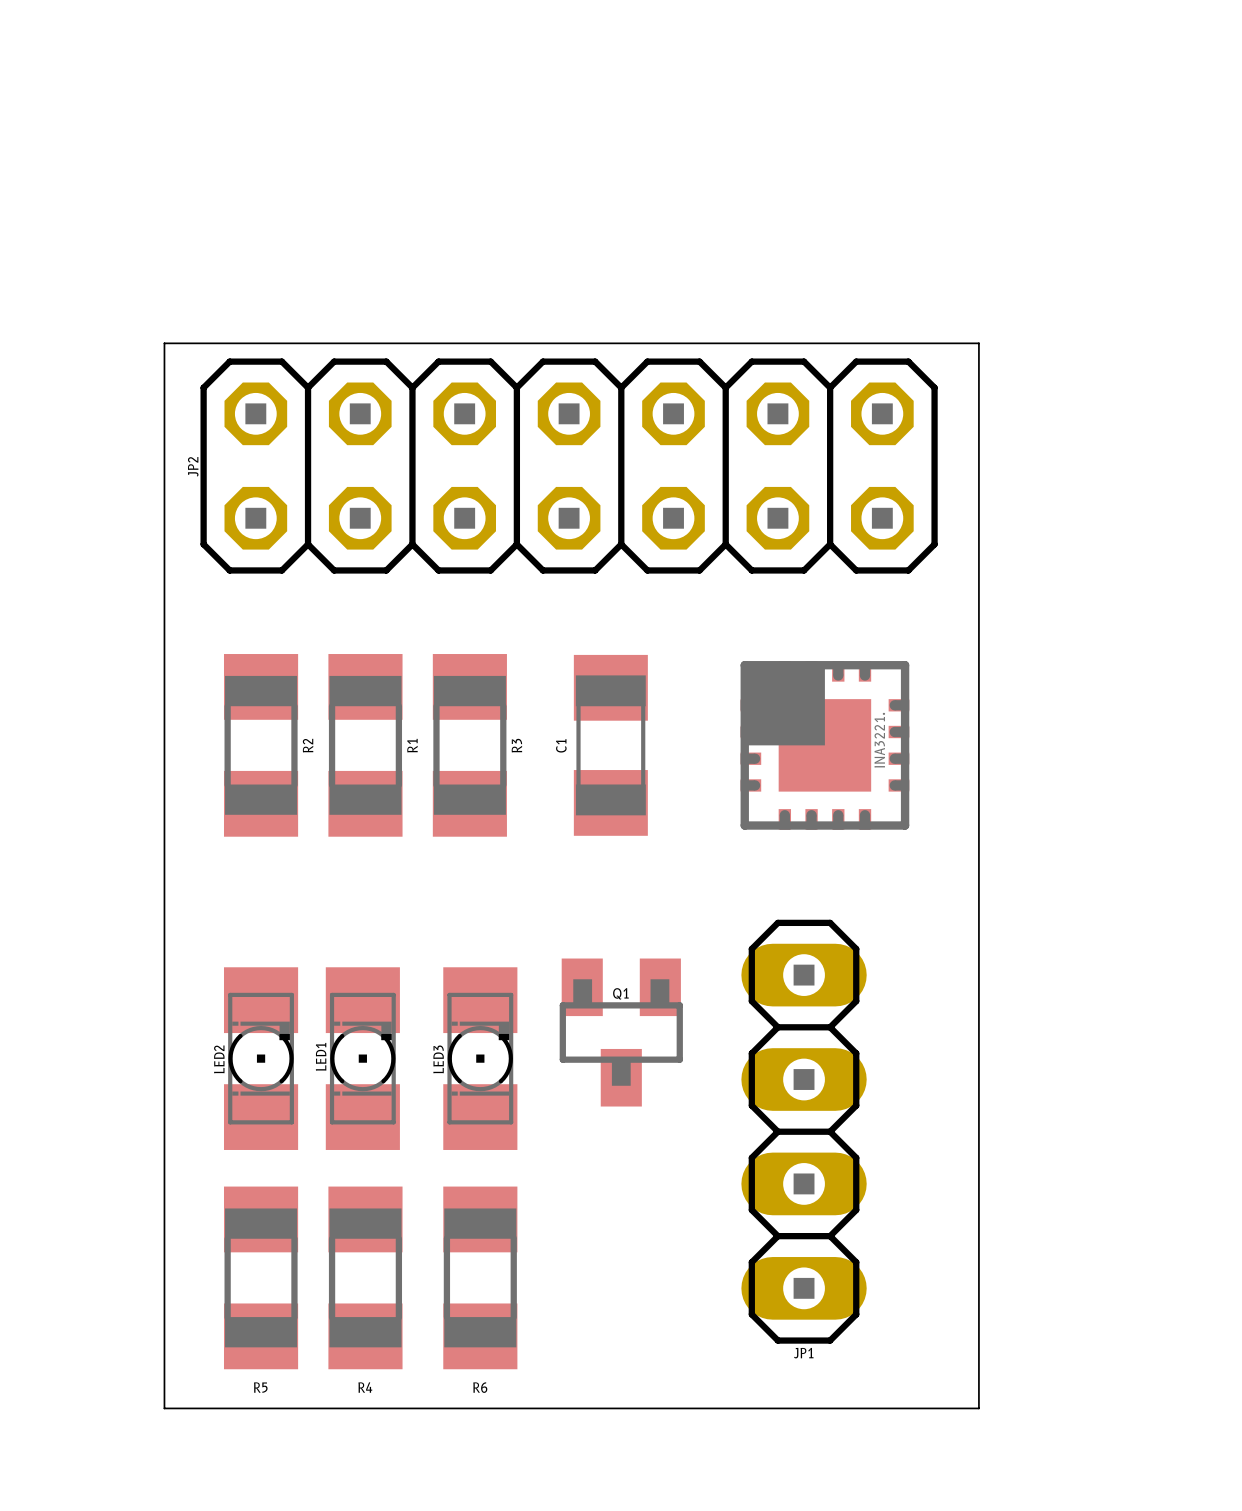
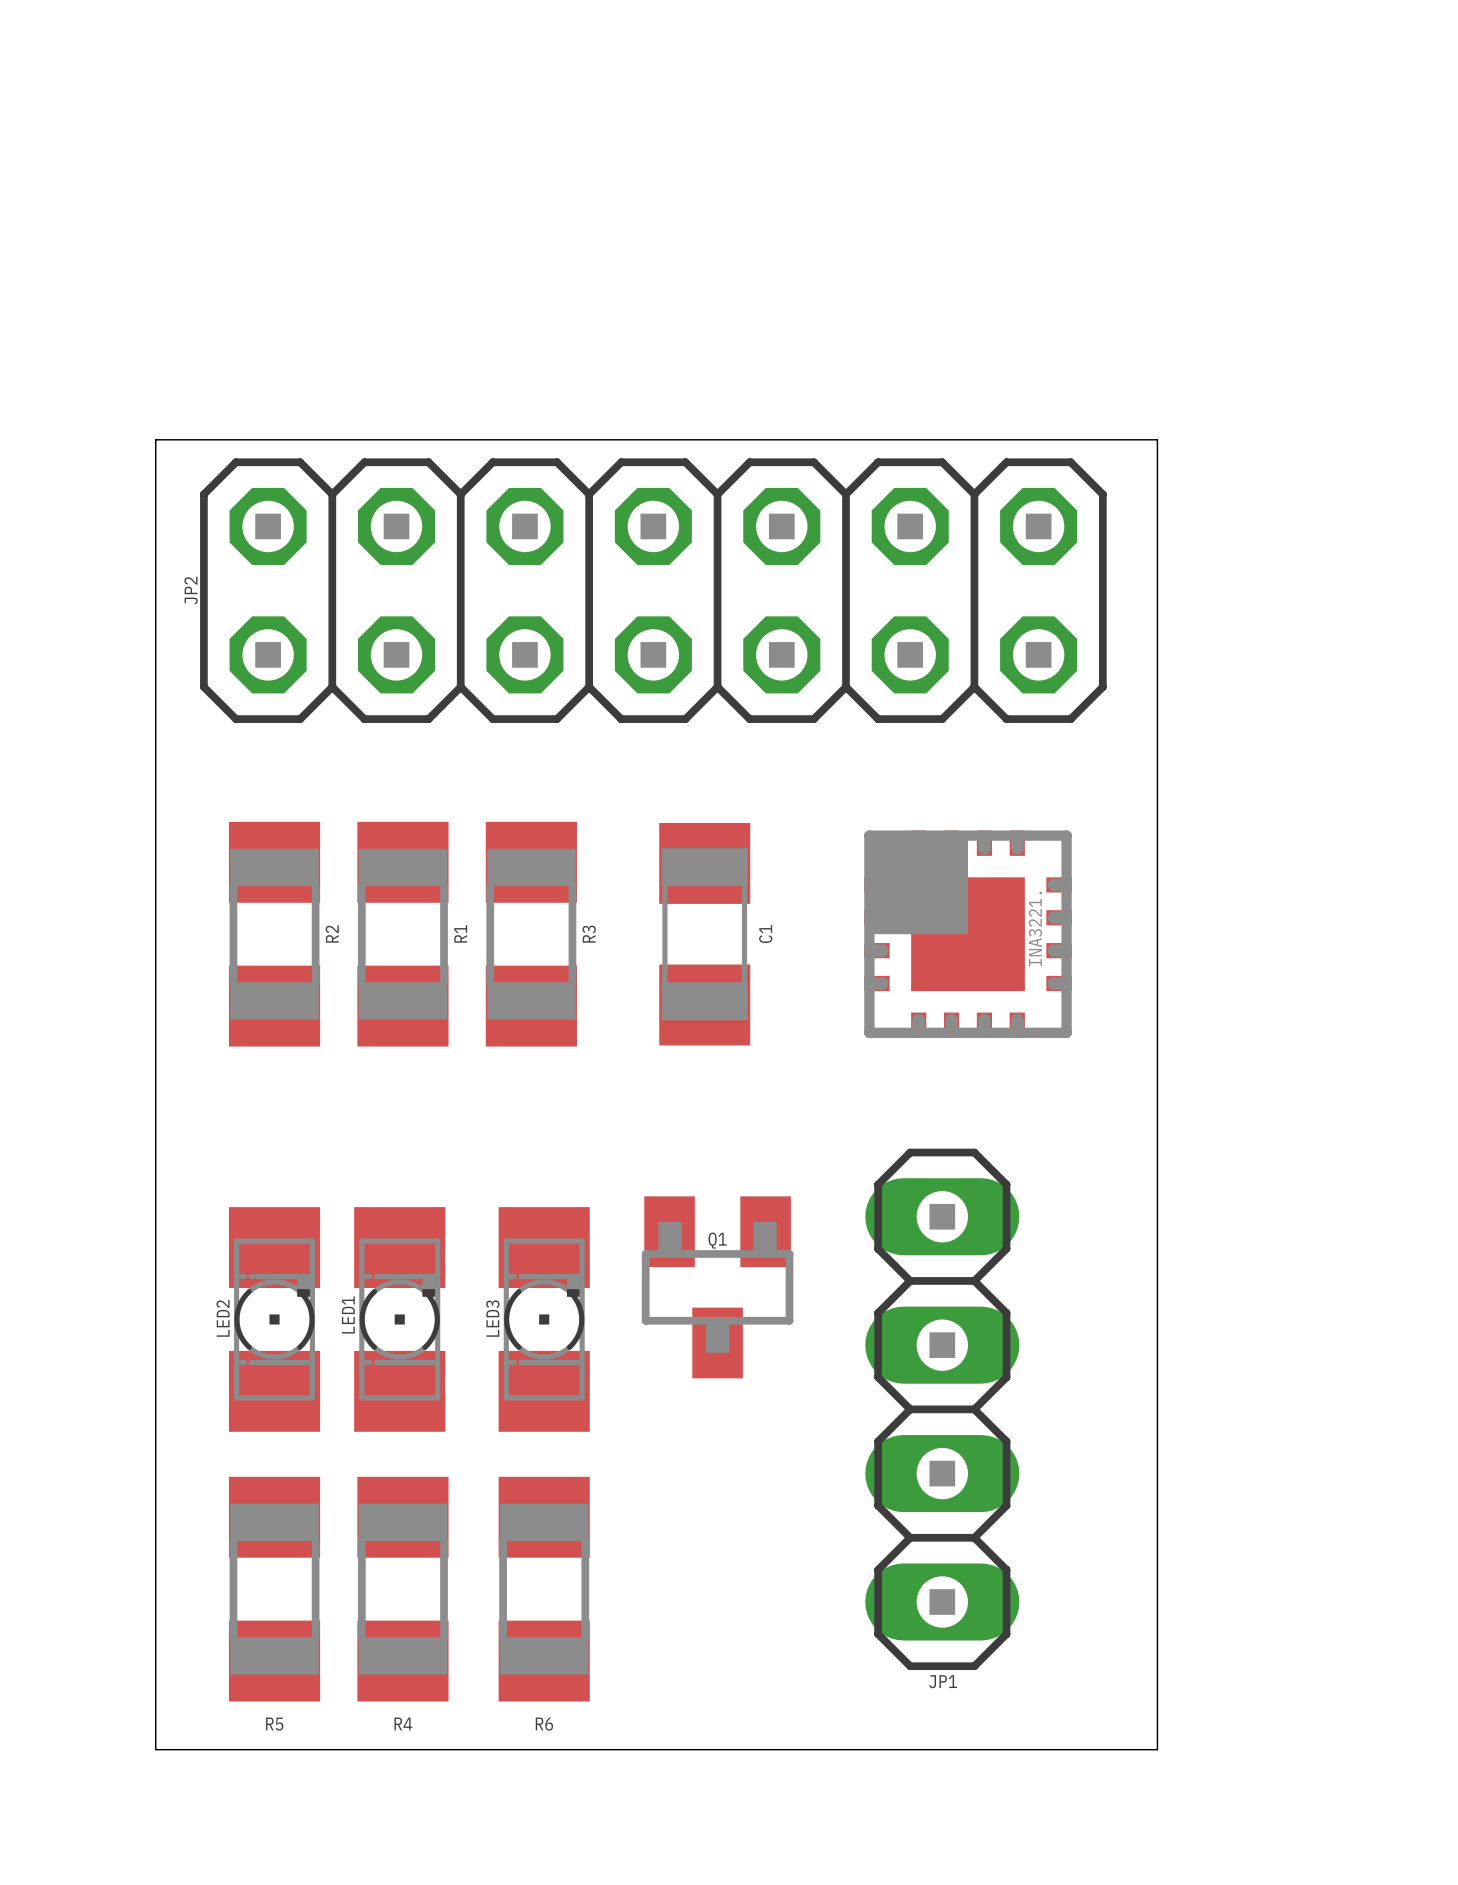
C1 name position: C1 (561, 745) -> C1 (765, 934)

